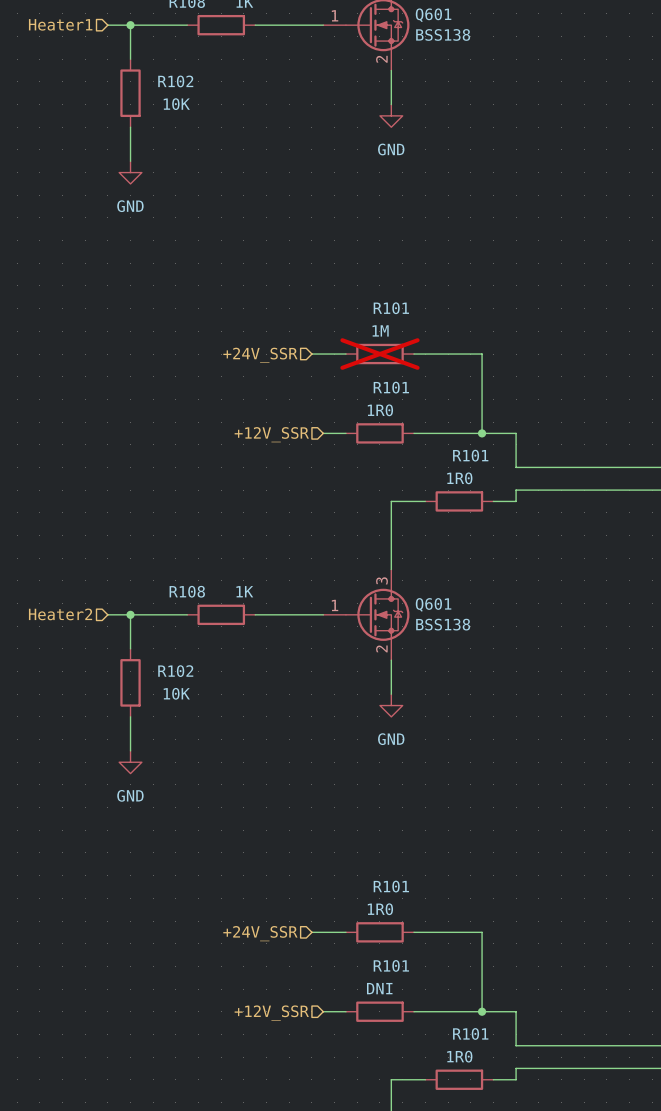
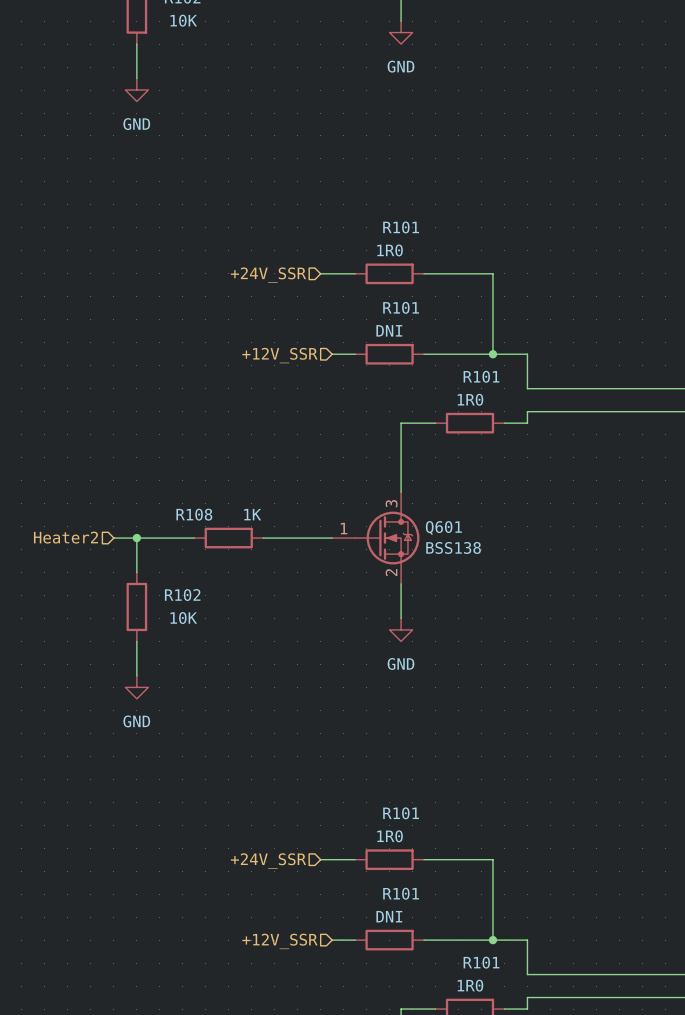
R101 value: 1M (380, 330) -> 1R0 (390, 250)
R101 do-not-place cross: (379, 354) -> none
R101 value: 1R0 (380, 410) -> DNI (389, 330)

